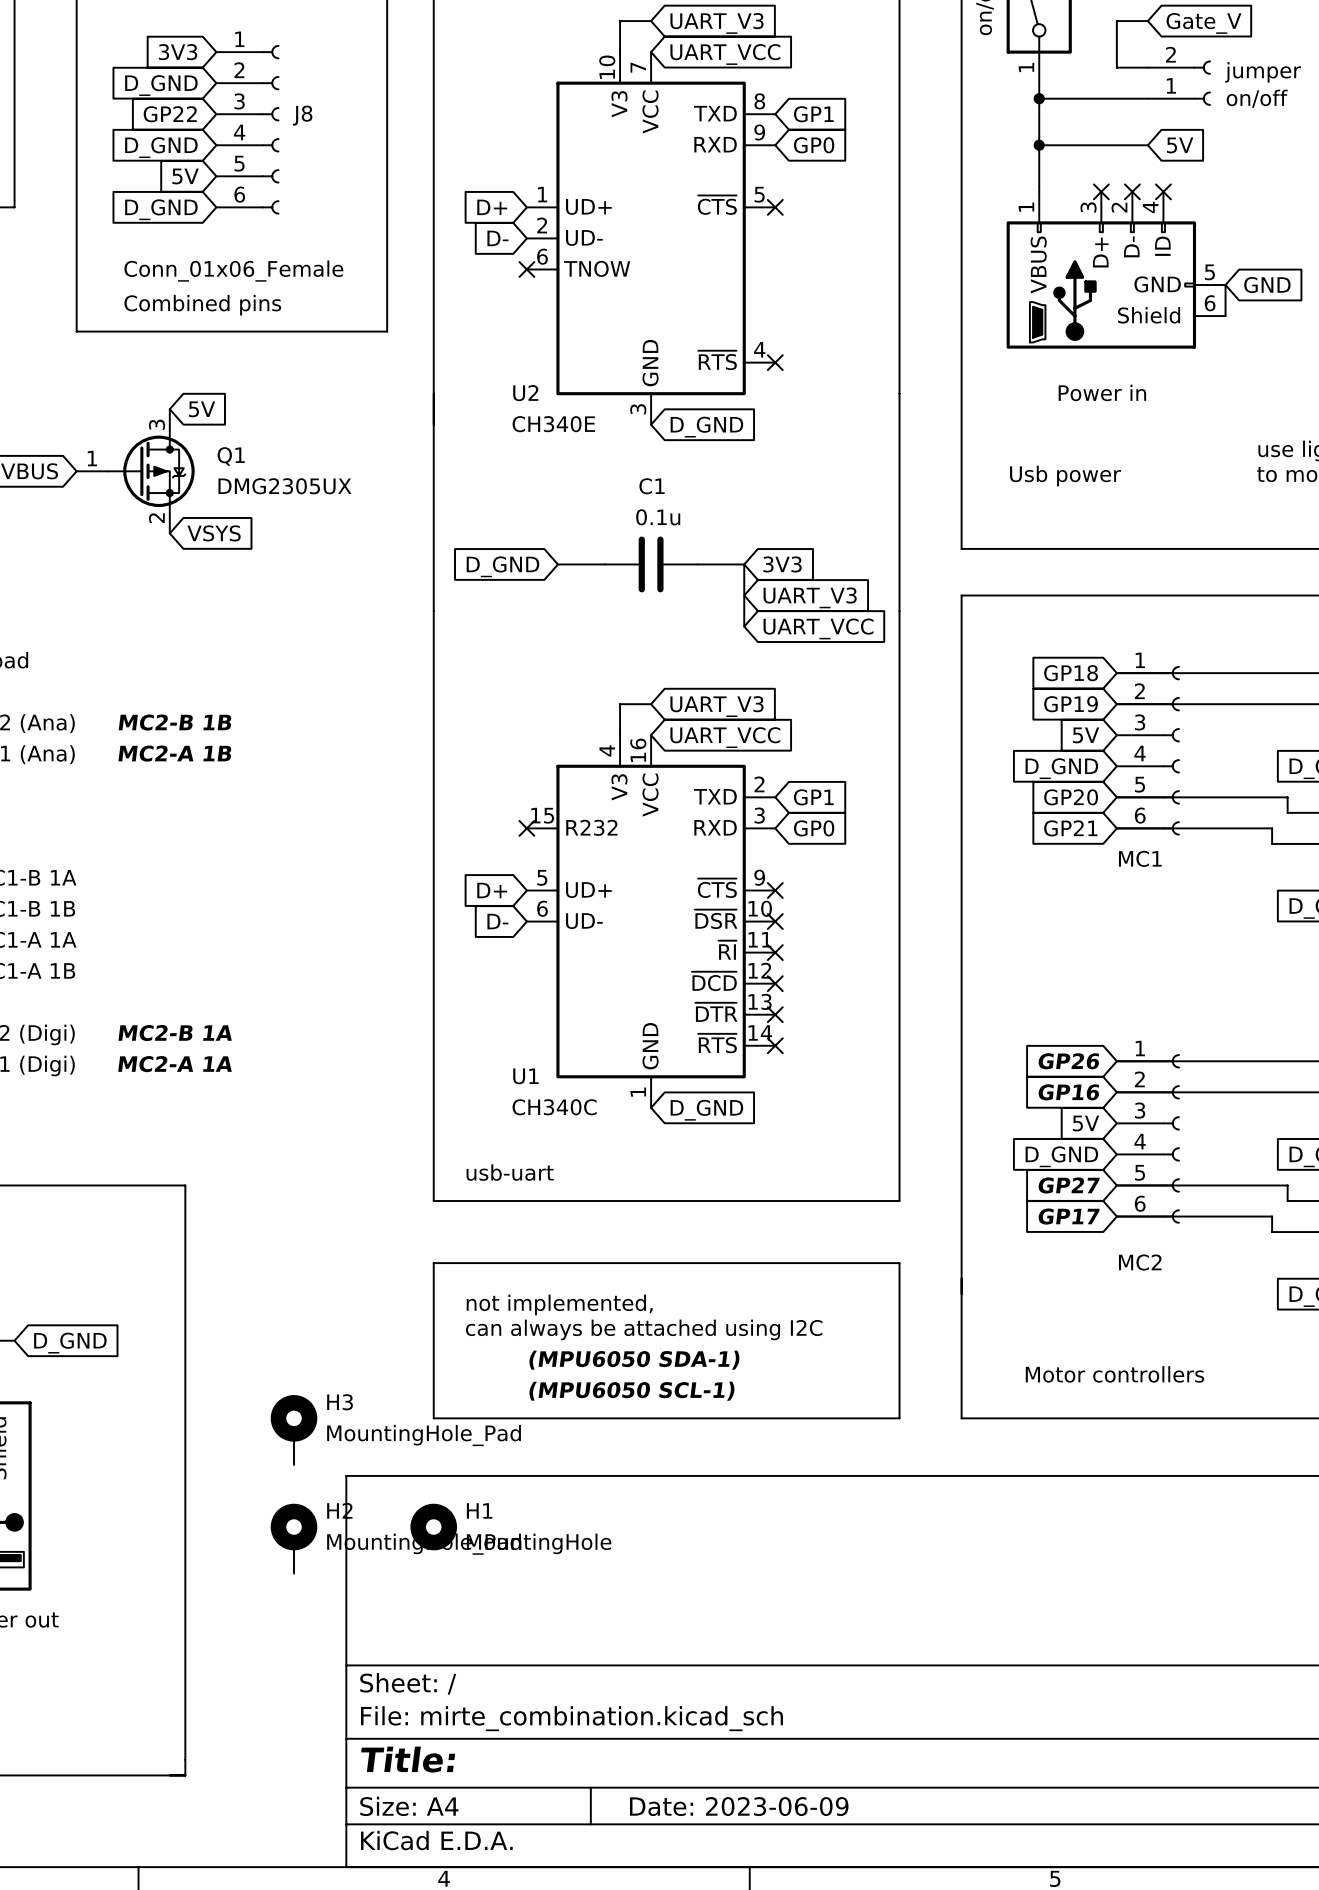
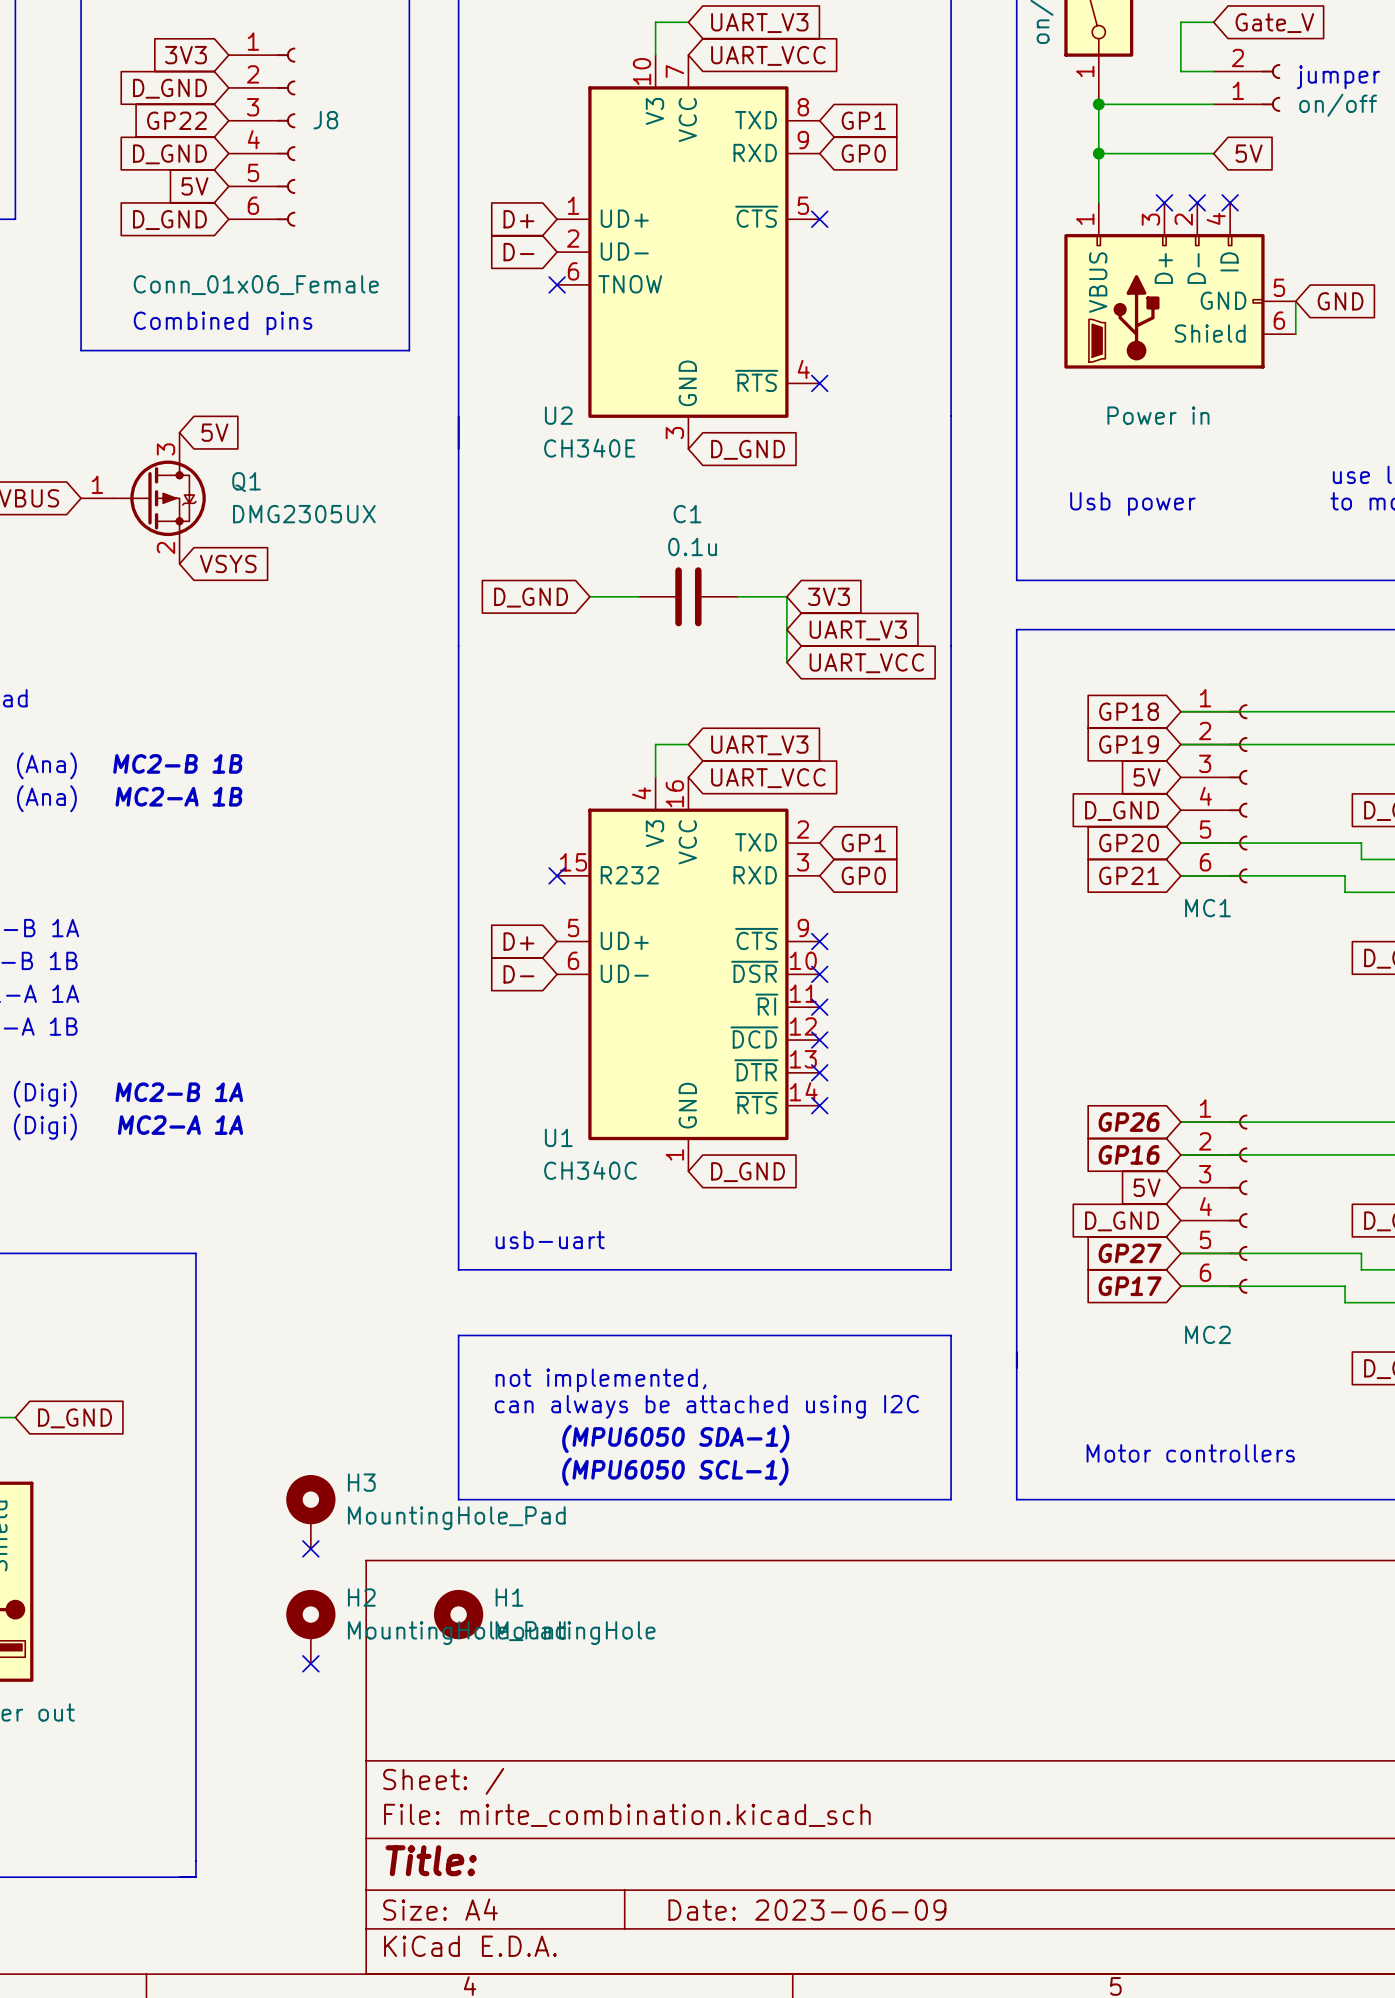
no-connect mark: none -> (310, 1548)
no-connect mark: none -> (310, 1663)

